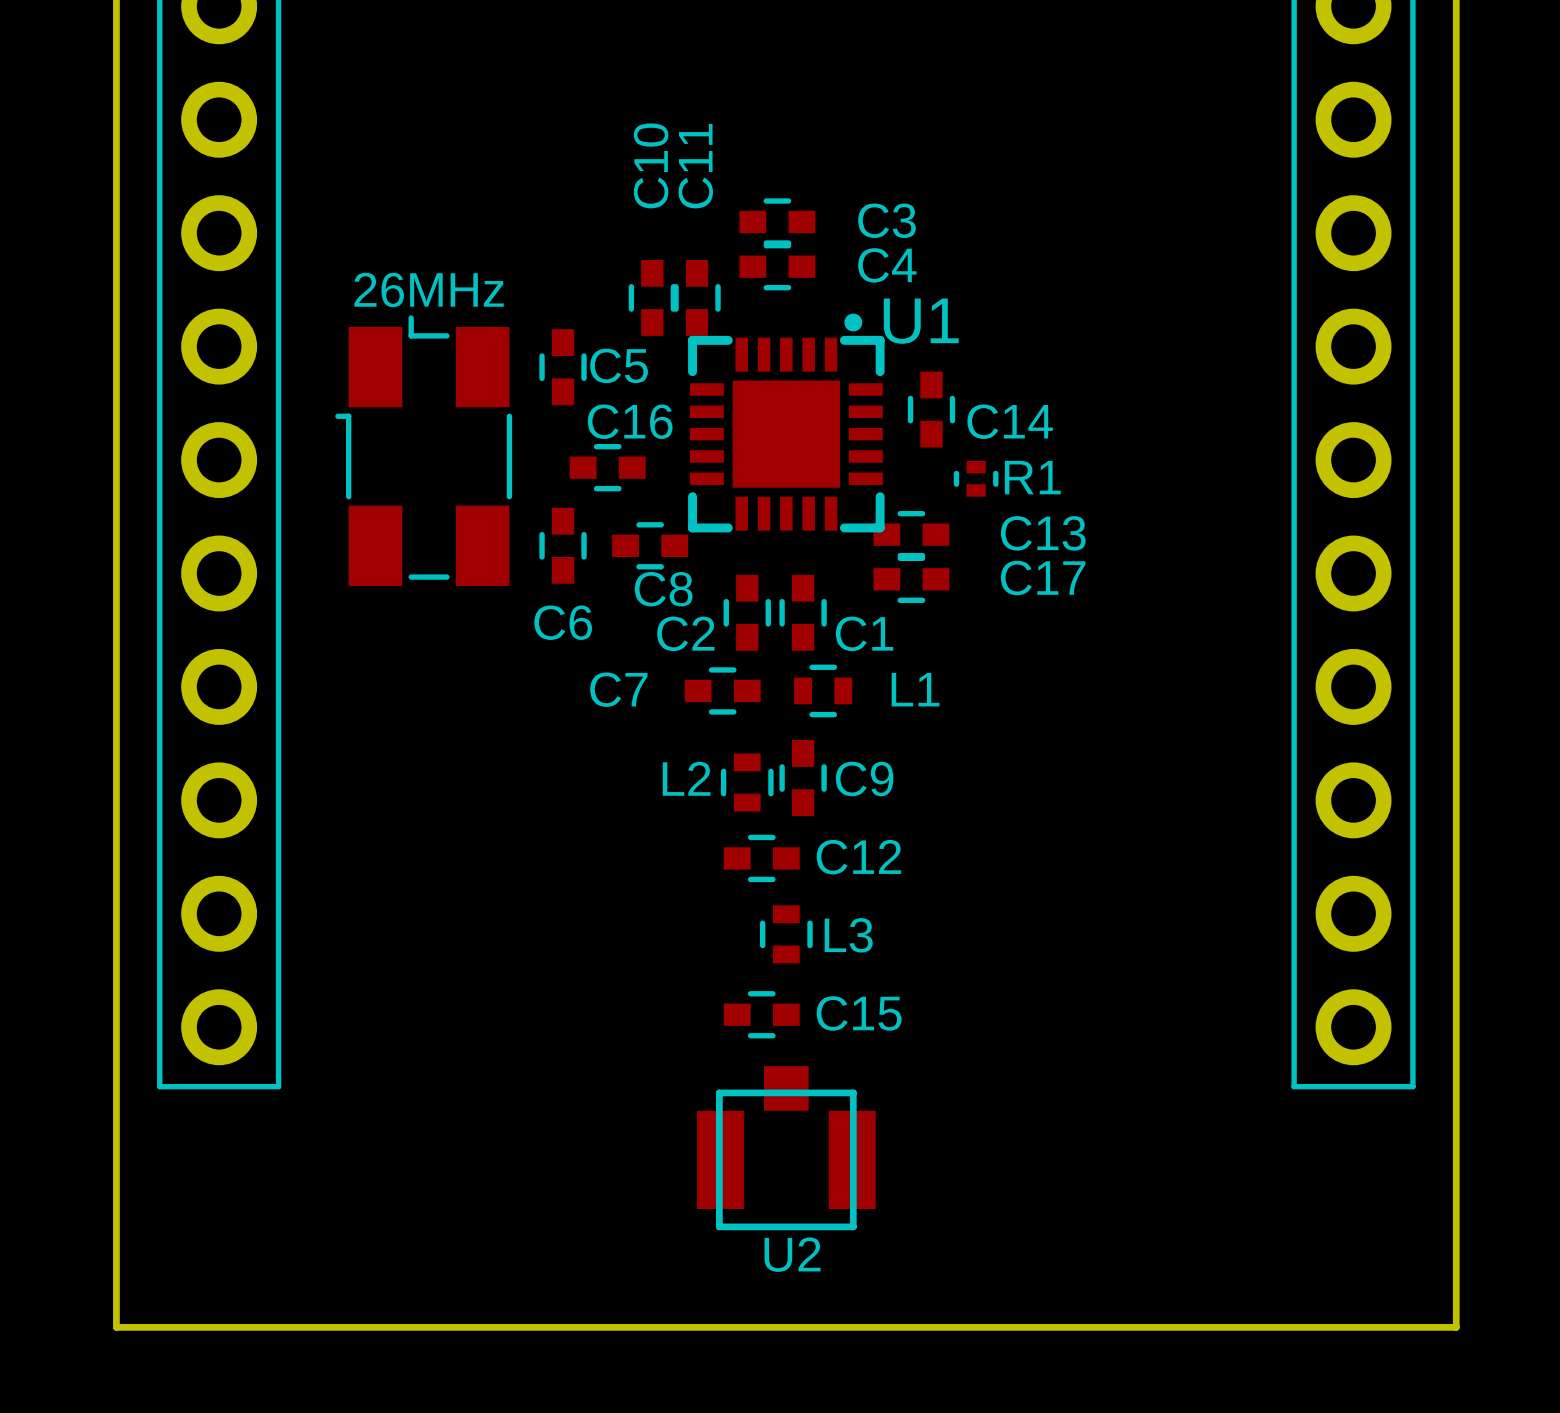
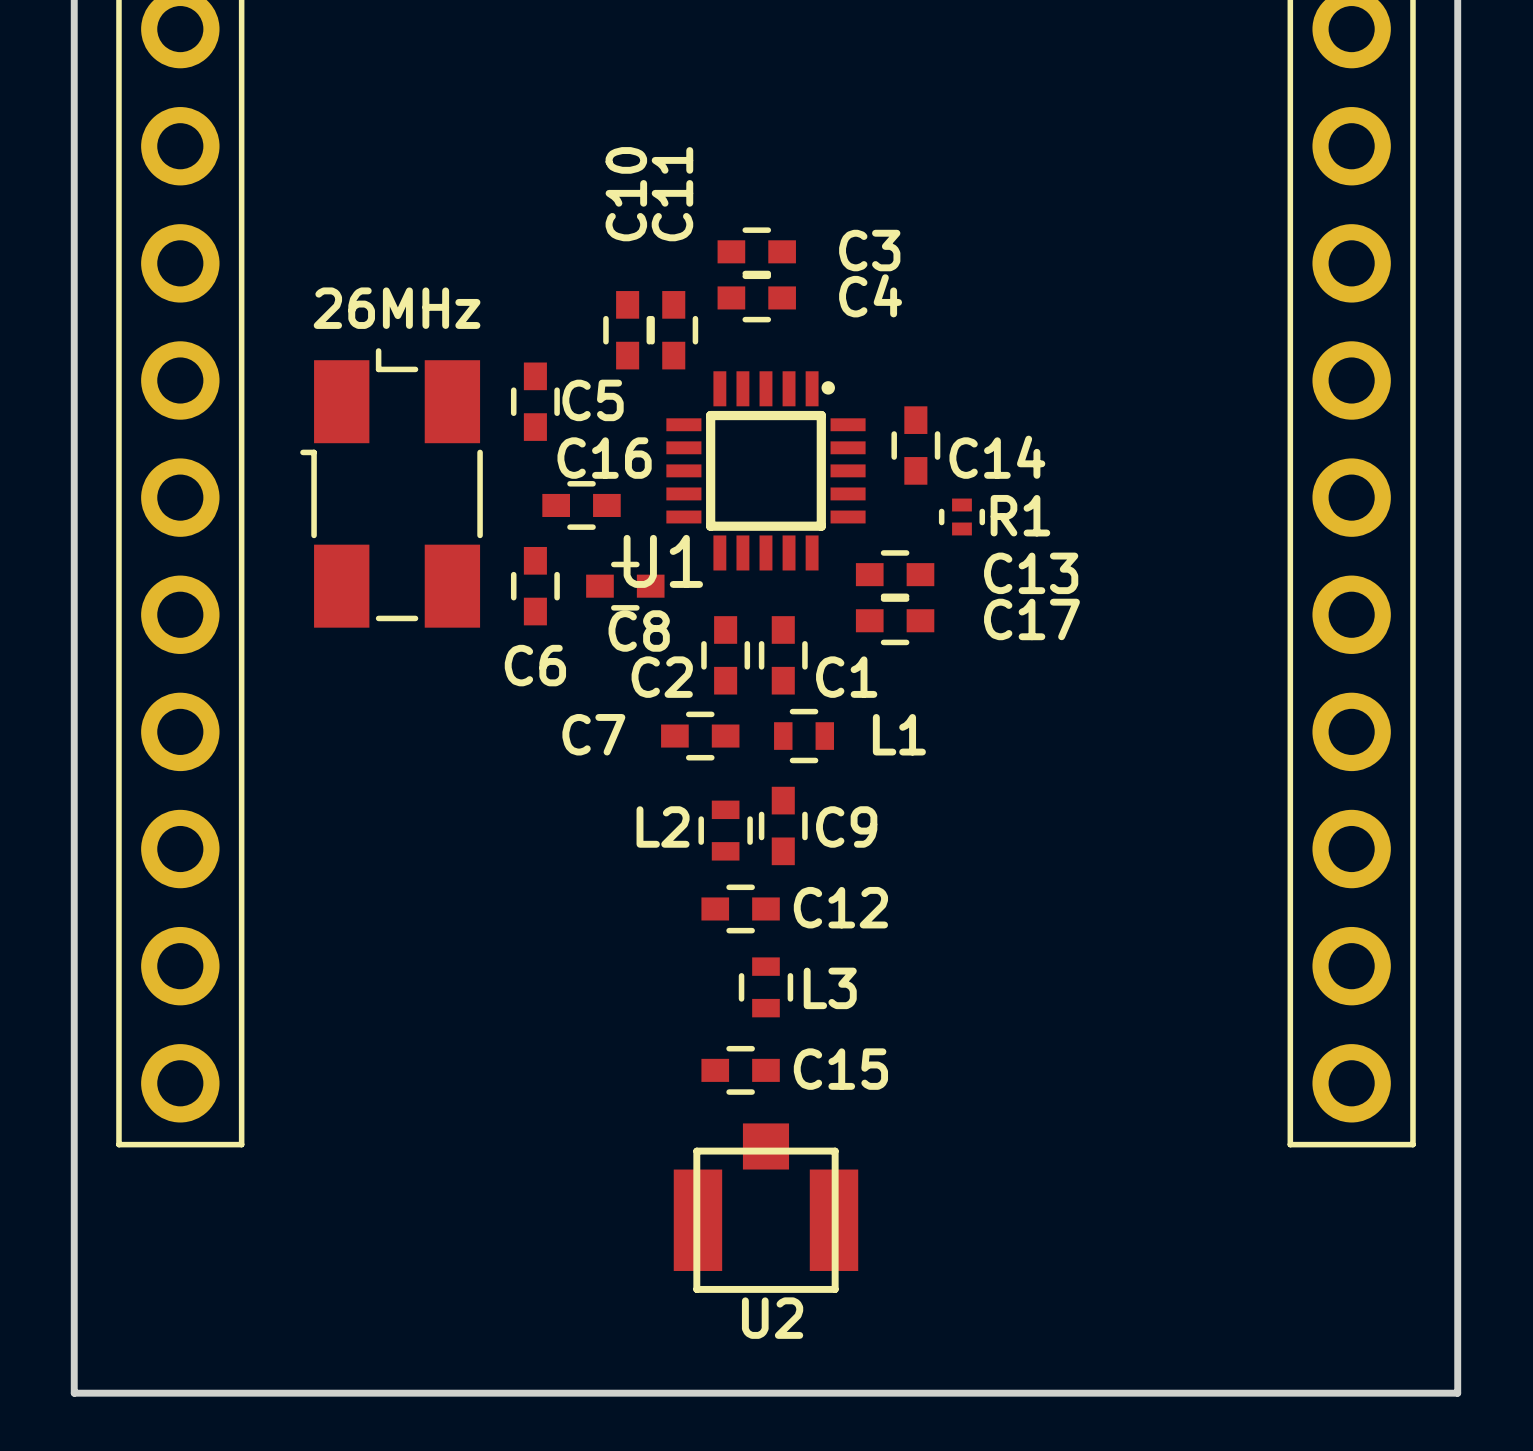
26MHz name: none -> 26MHz (397, 308)
text: 26MHz (429, 289) -> none
U1 footprint: [688, 313, 885, 533] -> [666, 371, 866, 571]
U1 name position: U1 (921, 321) -> U1 (663, 561)

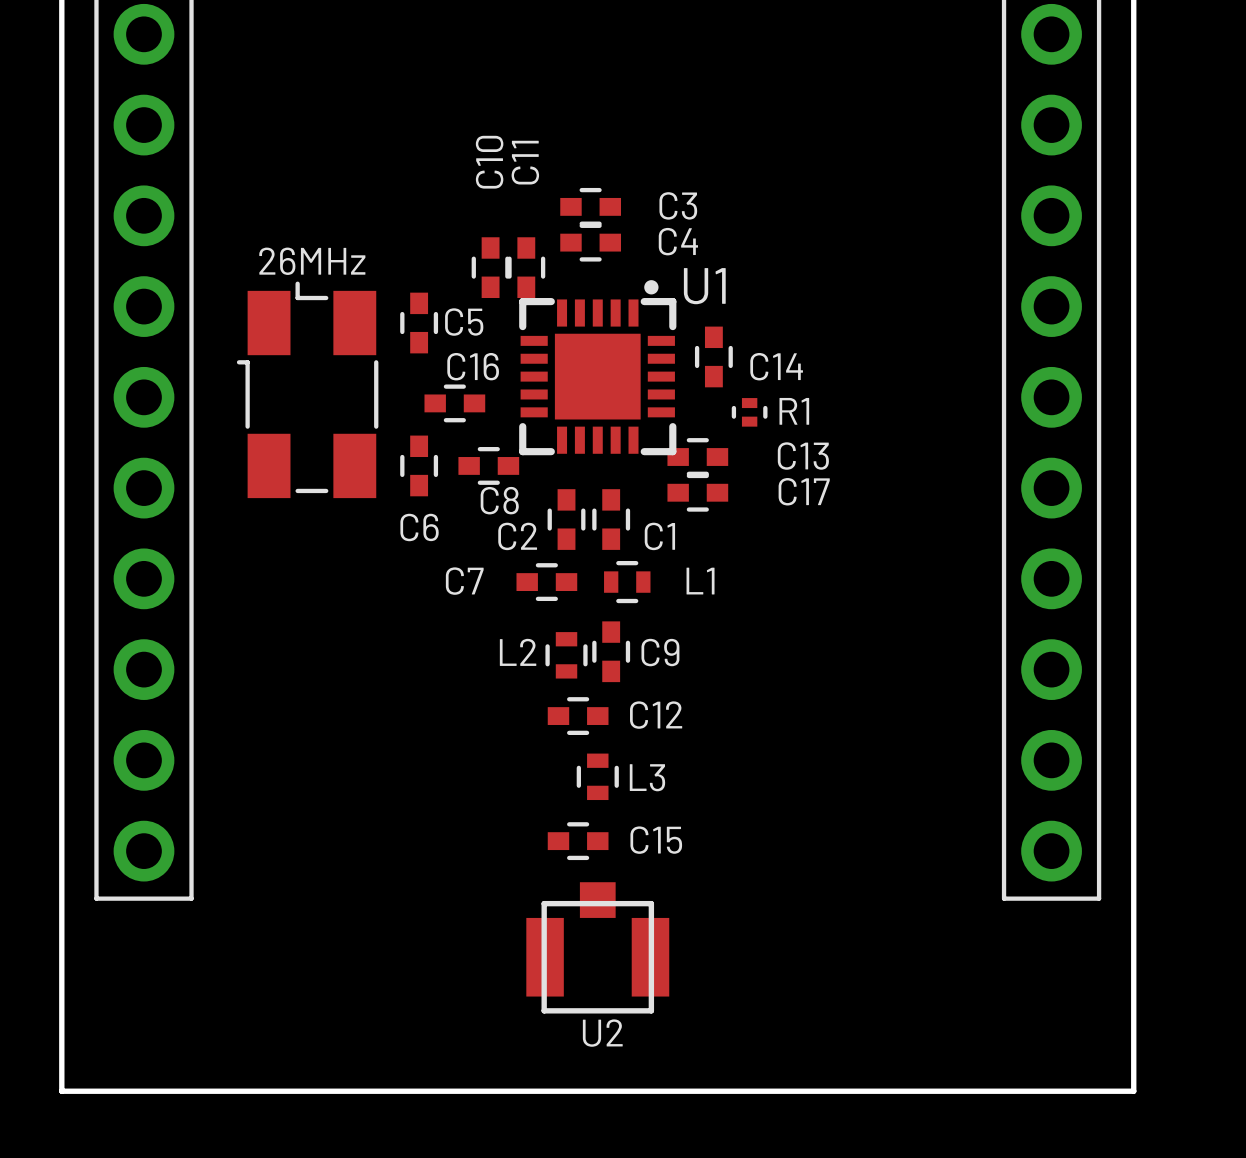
26MHz name: 26MHz (397, 308) -> none
text: none -> 26MHz (312, 261)
U1 footprint: [666, 371, 866, 571] -> [519, 280, 677, 456]
U1 name position: U1 (663, 561) -> U1 (704, 286)

